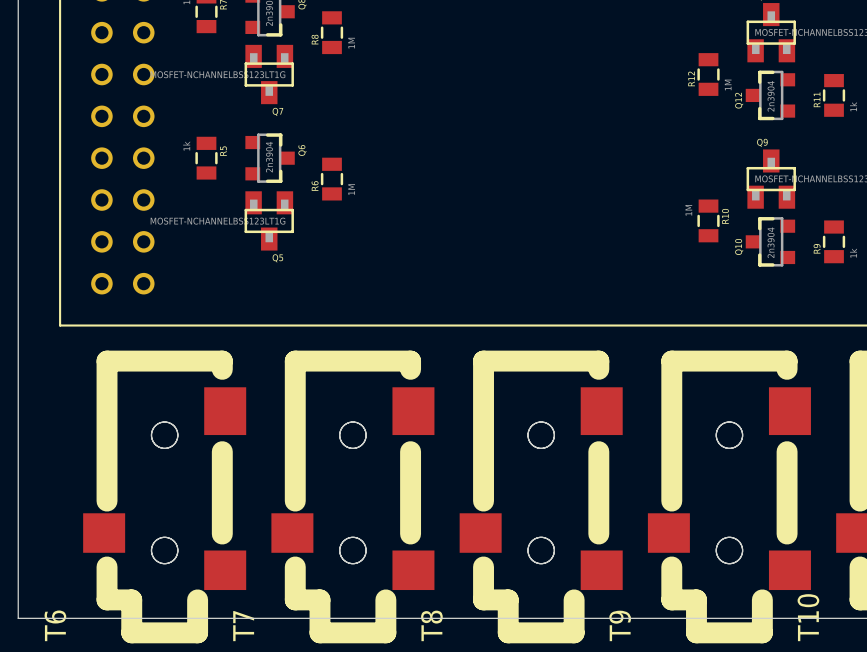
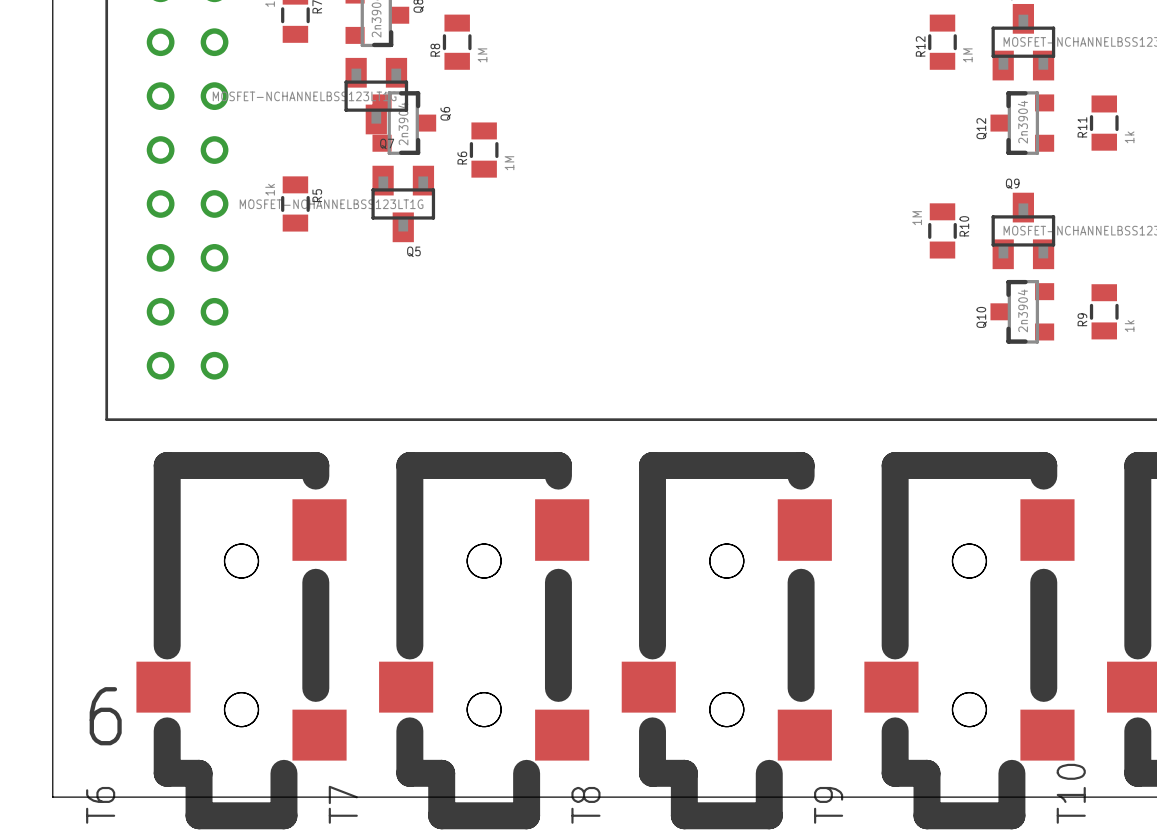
R12 position: (708, 74) -> (942, 42)
Q6 position: (270, 158) -> (404, 123)
R6 position: (332, 179) -> (484, 150)
Q5 position: (269, 220) -> (403, 203)
R10 position: (708, 220) -> (942, 230)
text: none -> 6 (105, 716)

